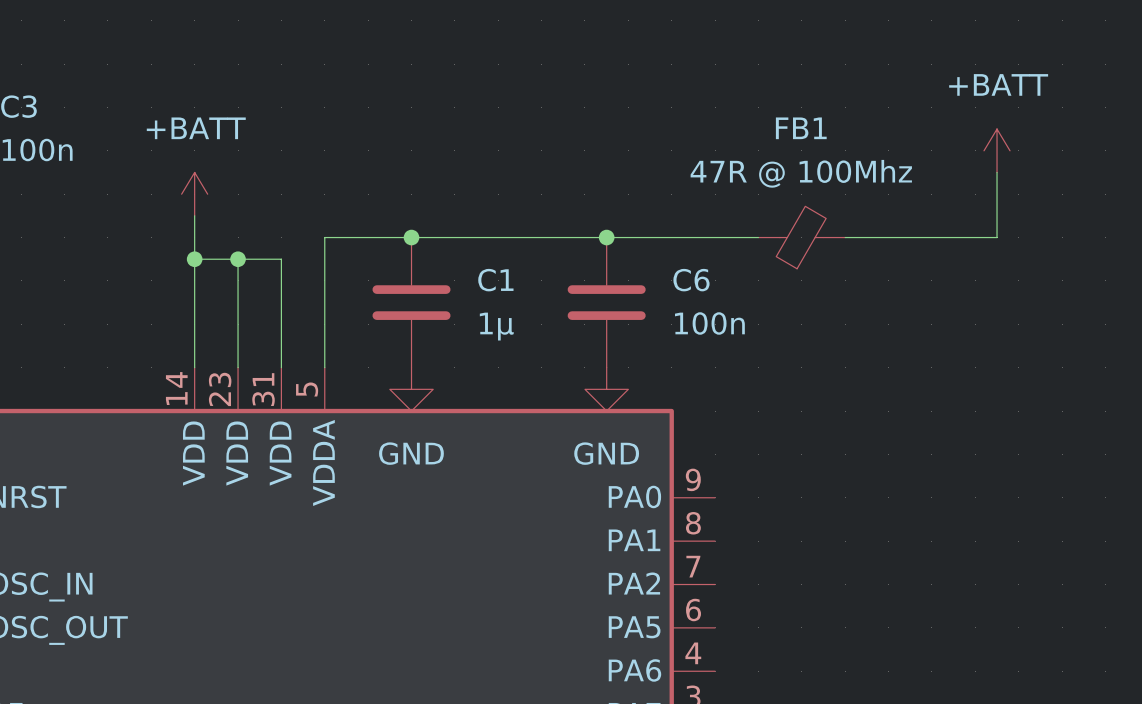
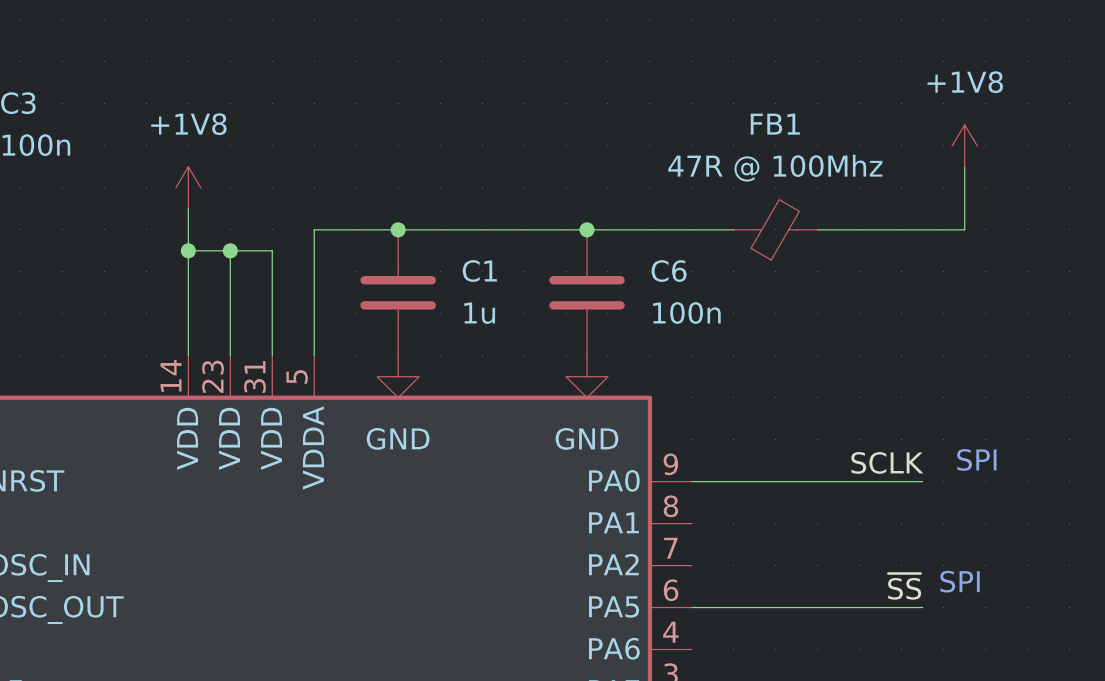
power symbol: +BATT (997, 150) -> +1V8 (964, 145)
power symbol: +BATT (194, 194) -> +1V8 (188, 187)
C1 value: 1µ (496, 326) -> 1u (479, 313)
text: none -> SPI (976, 459)
label: none -> SCLK (887, 462)
wire: none -> (691, 481) (922, 481)
text: none -> SPI (960, 581)
label: none -> ~{SS} (904, 586)
wire: none -> (691, 607) (922, 607)

